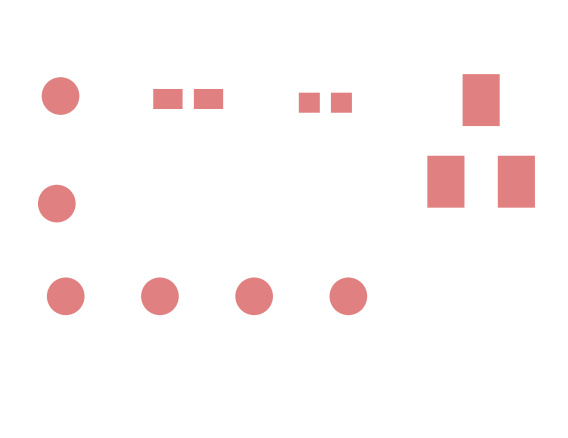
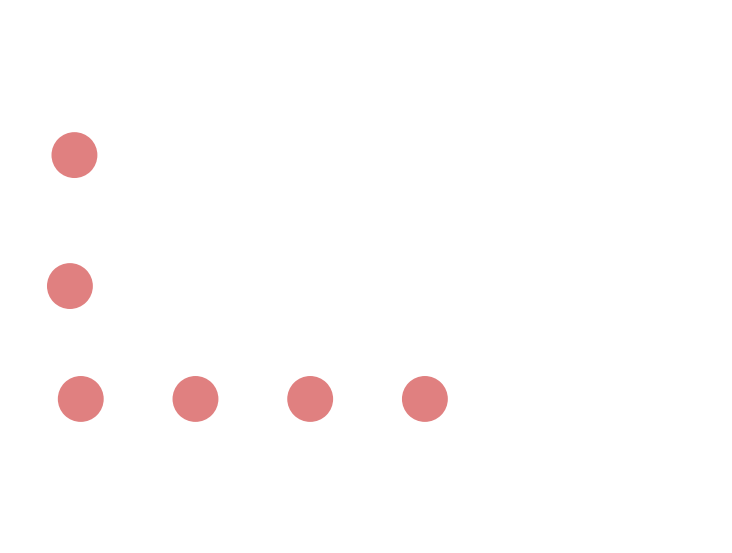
part: (188, 98) -> none
part: (325, 102) -> none
part: (481, 140) -> none

